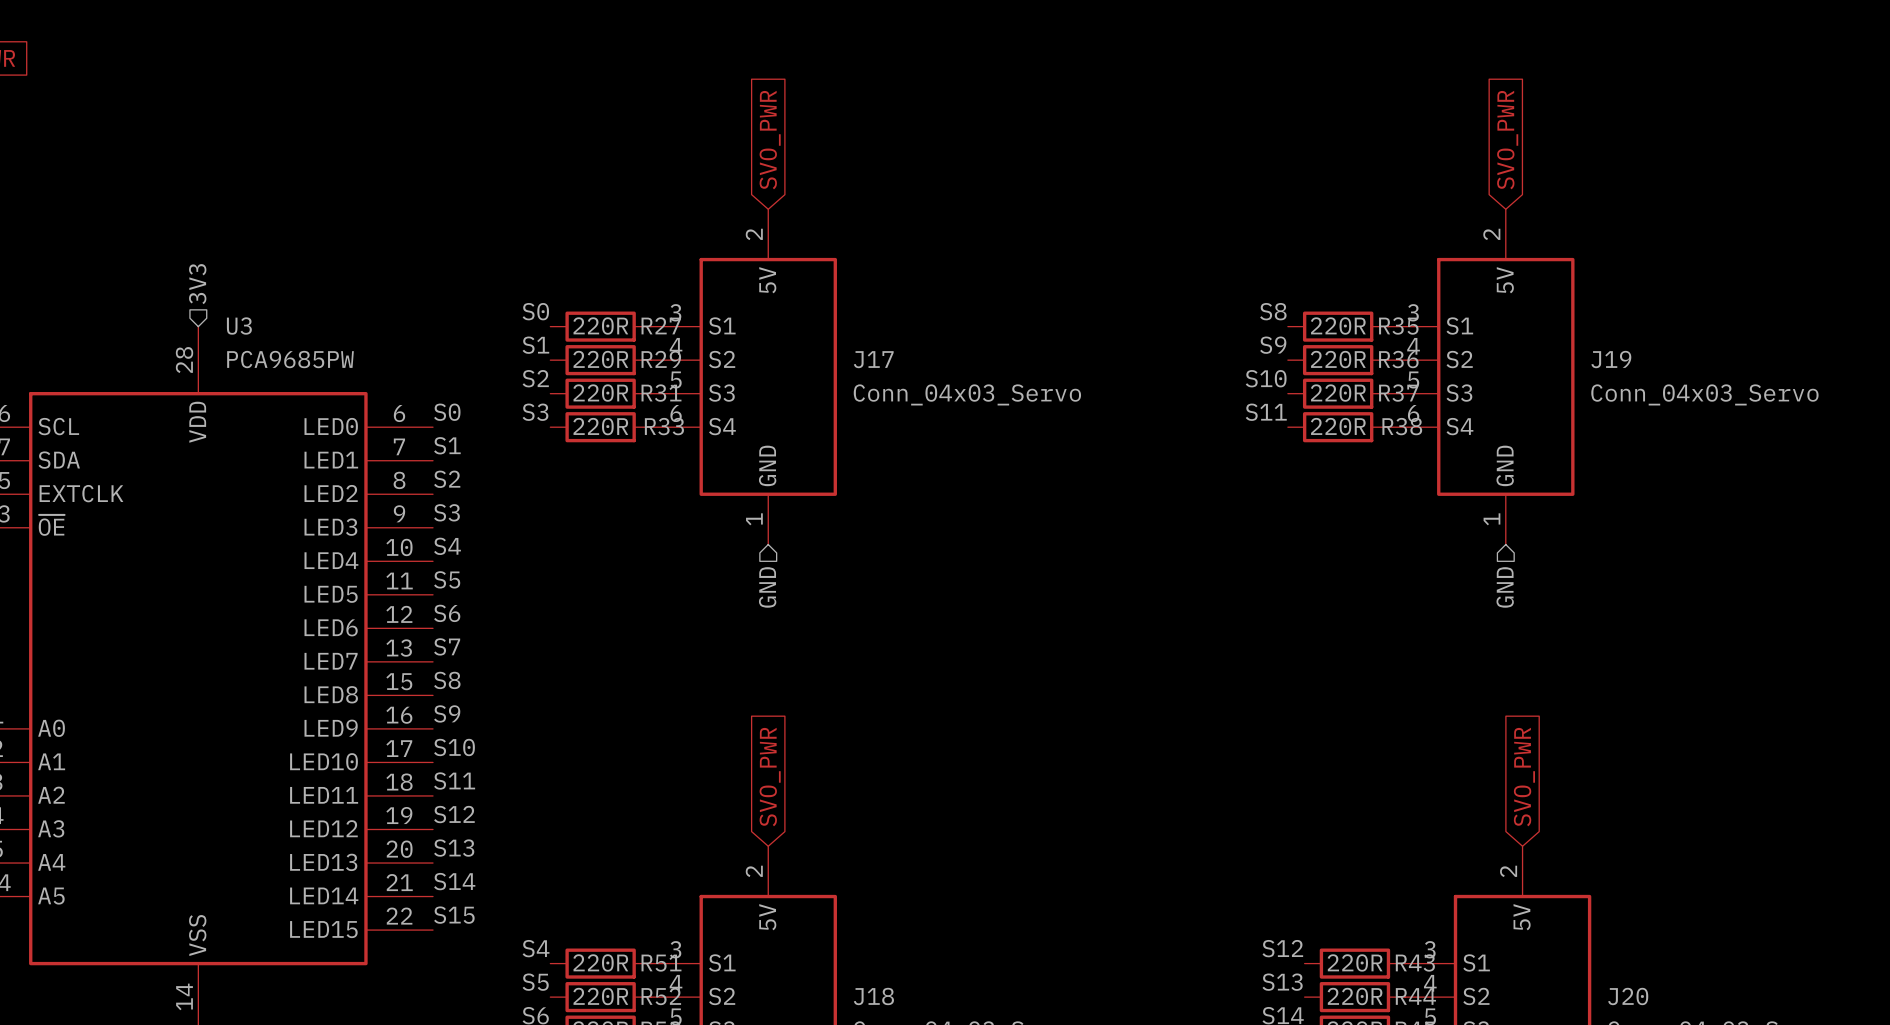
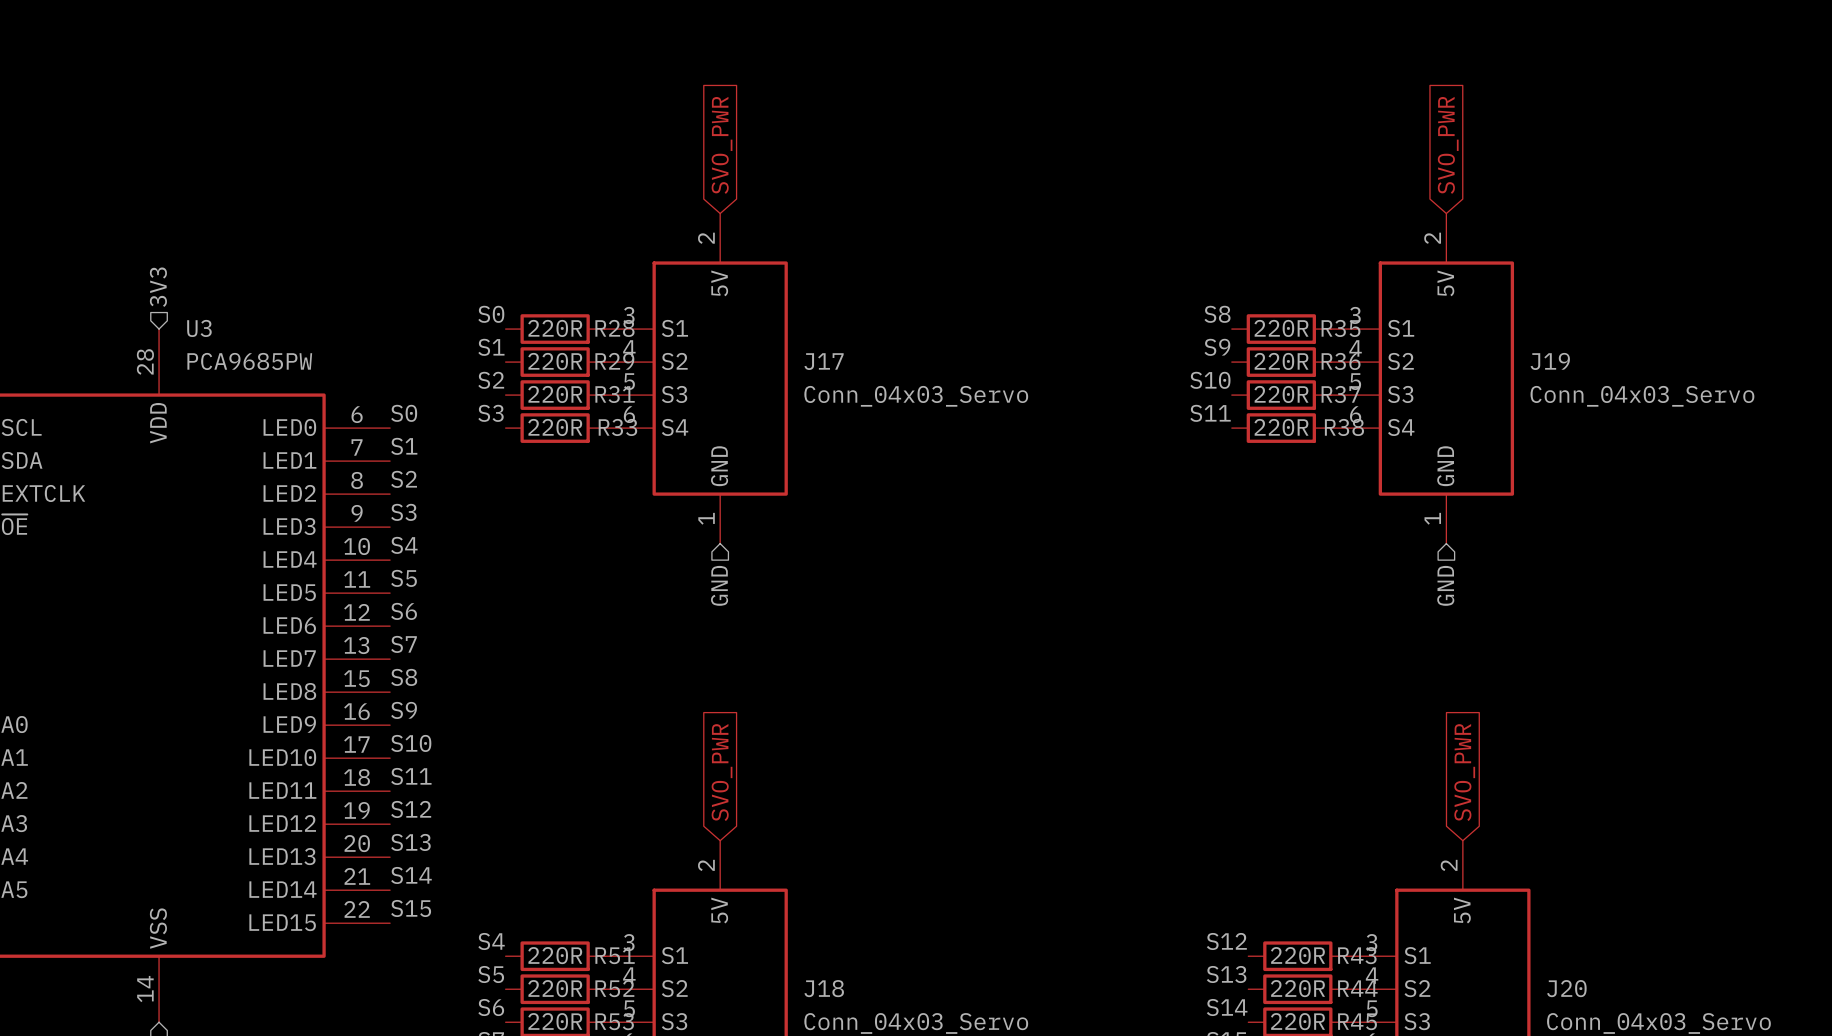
R27 name: R27 (661, 325) -> R28 (614, 328)

